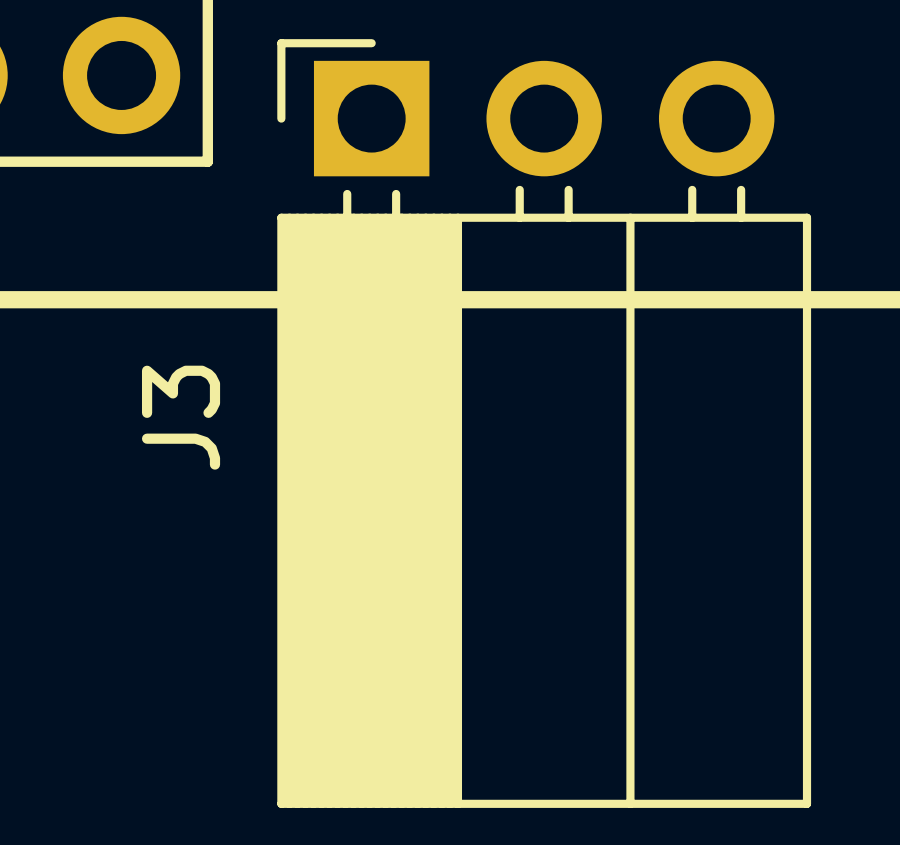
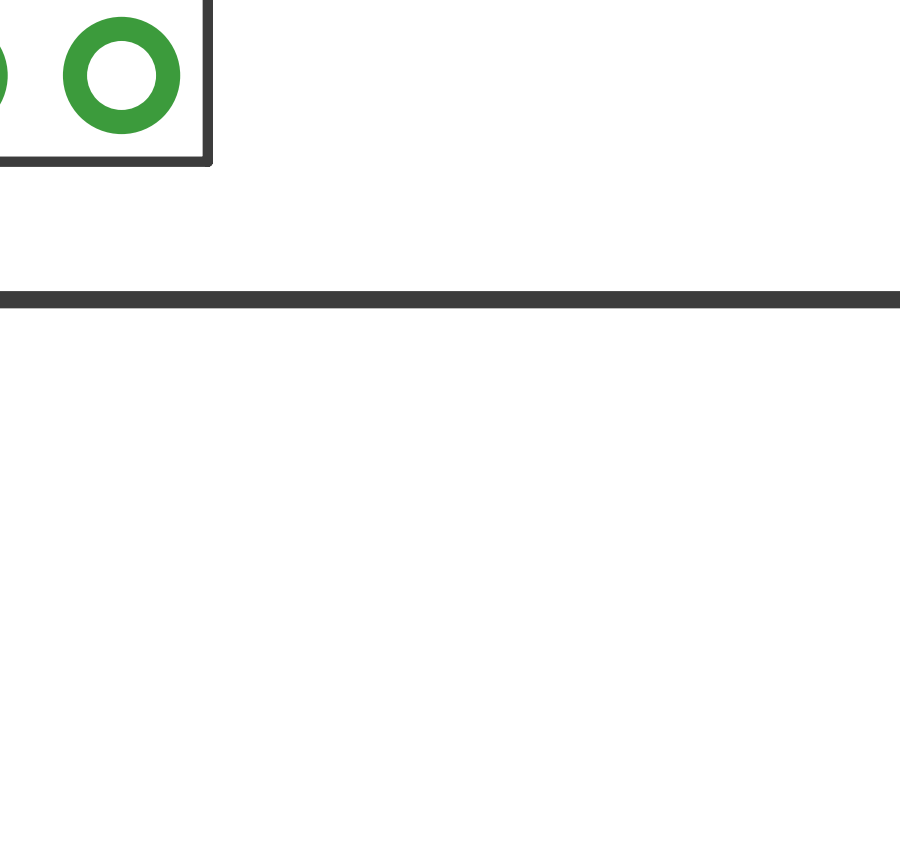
J3: (544, 423) -> none

